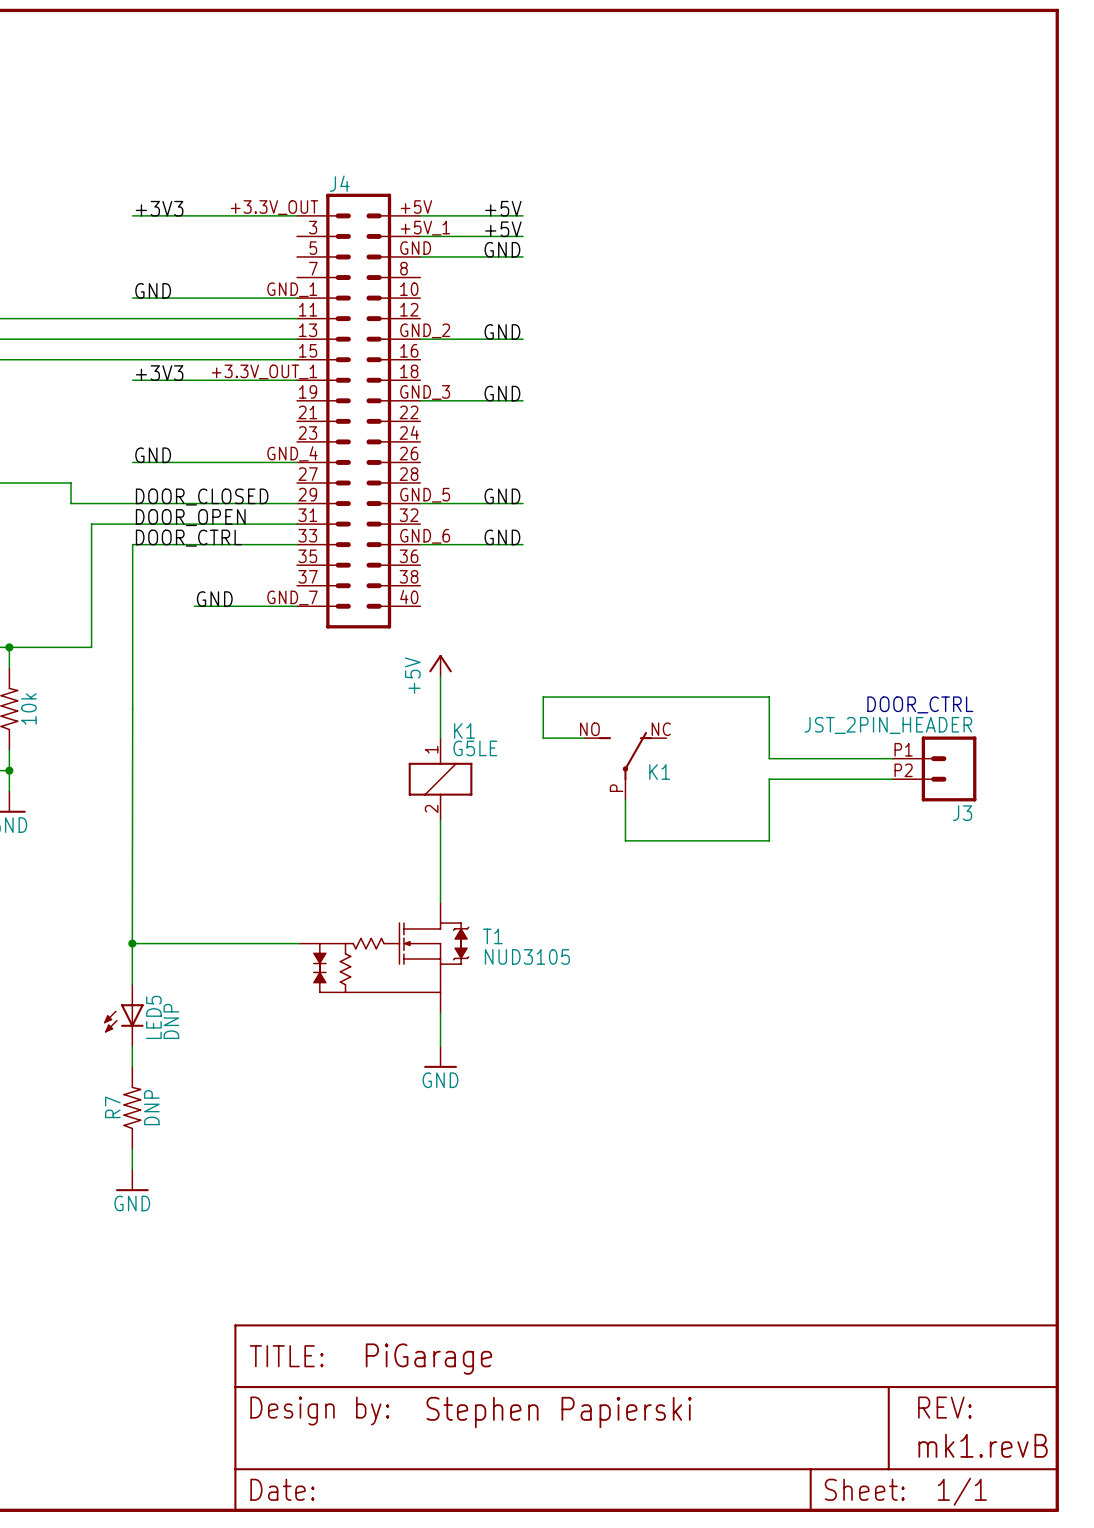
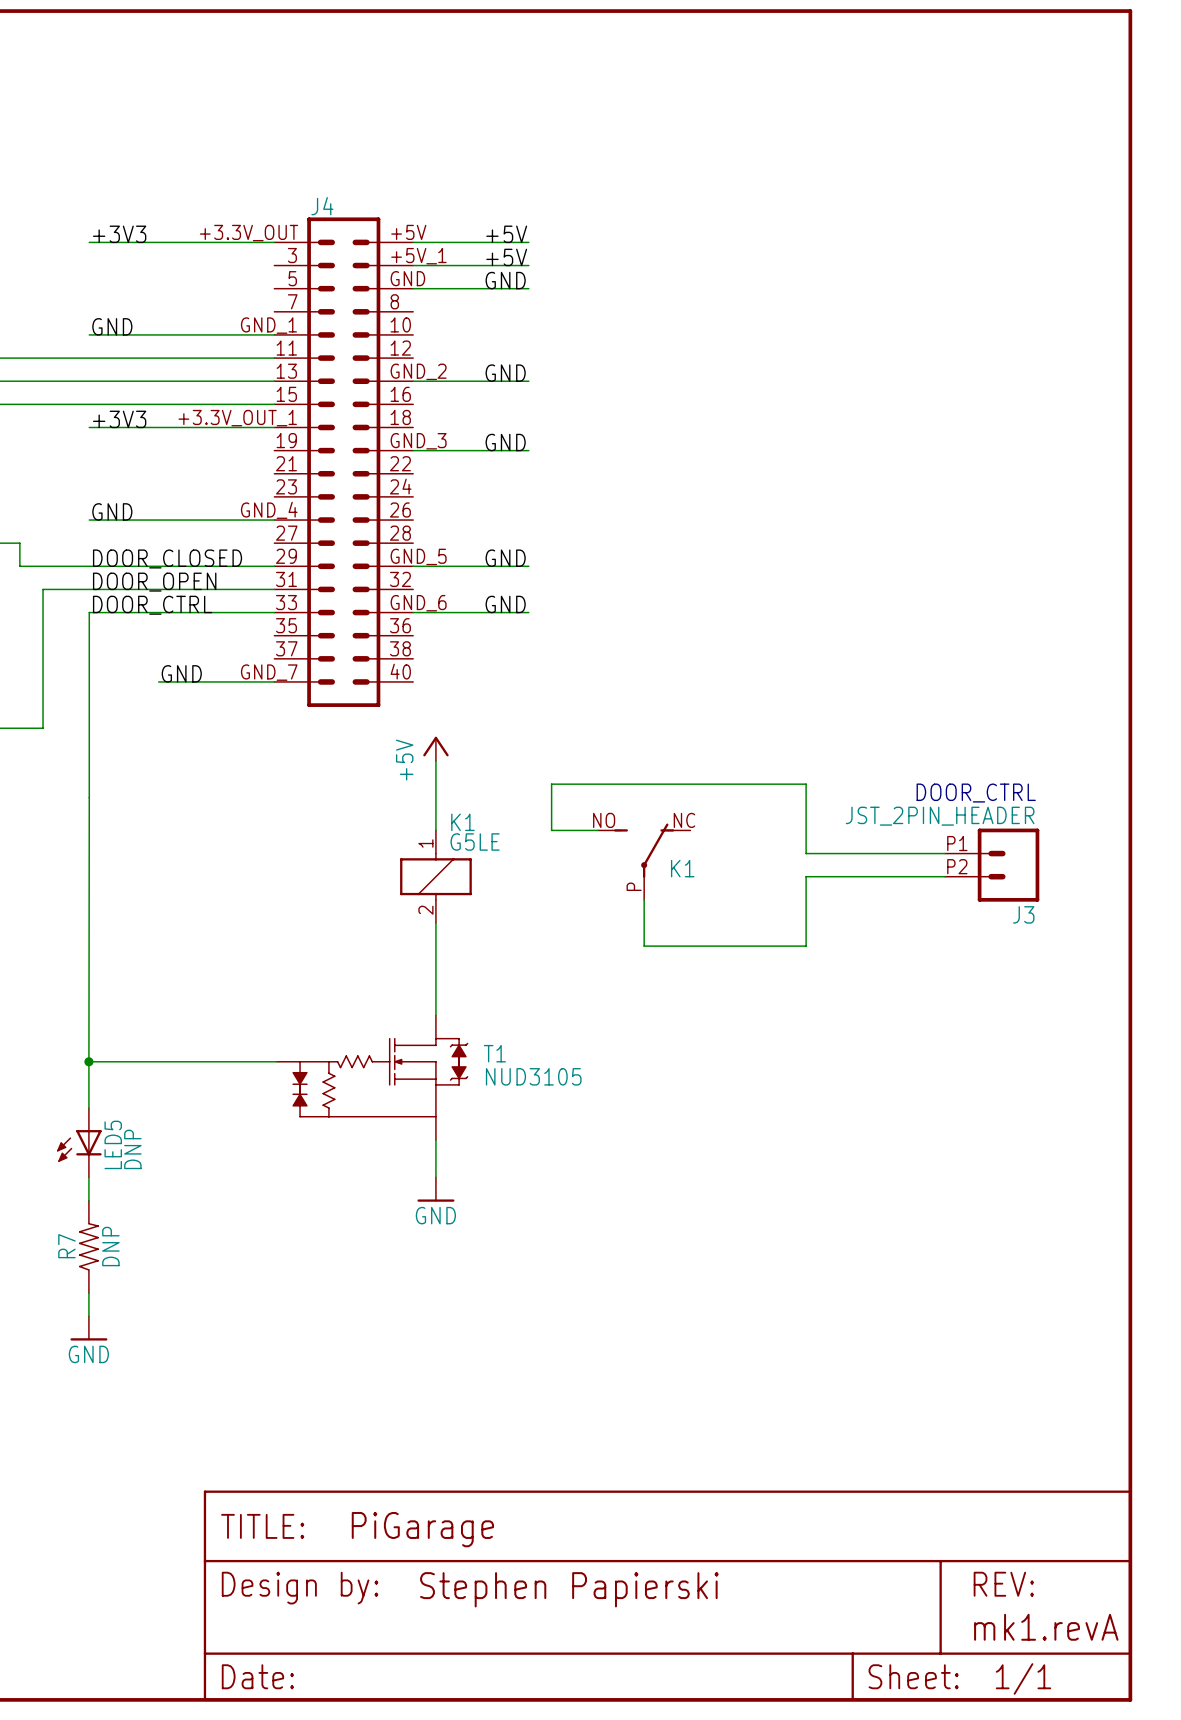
part text: mk1.revB (983, 1445) -> mk1.revA (1046, 1627)

